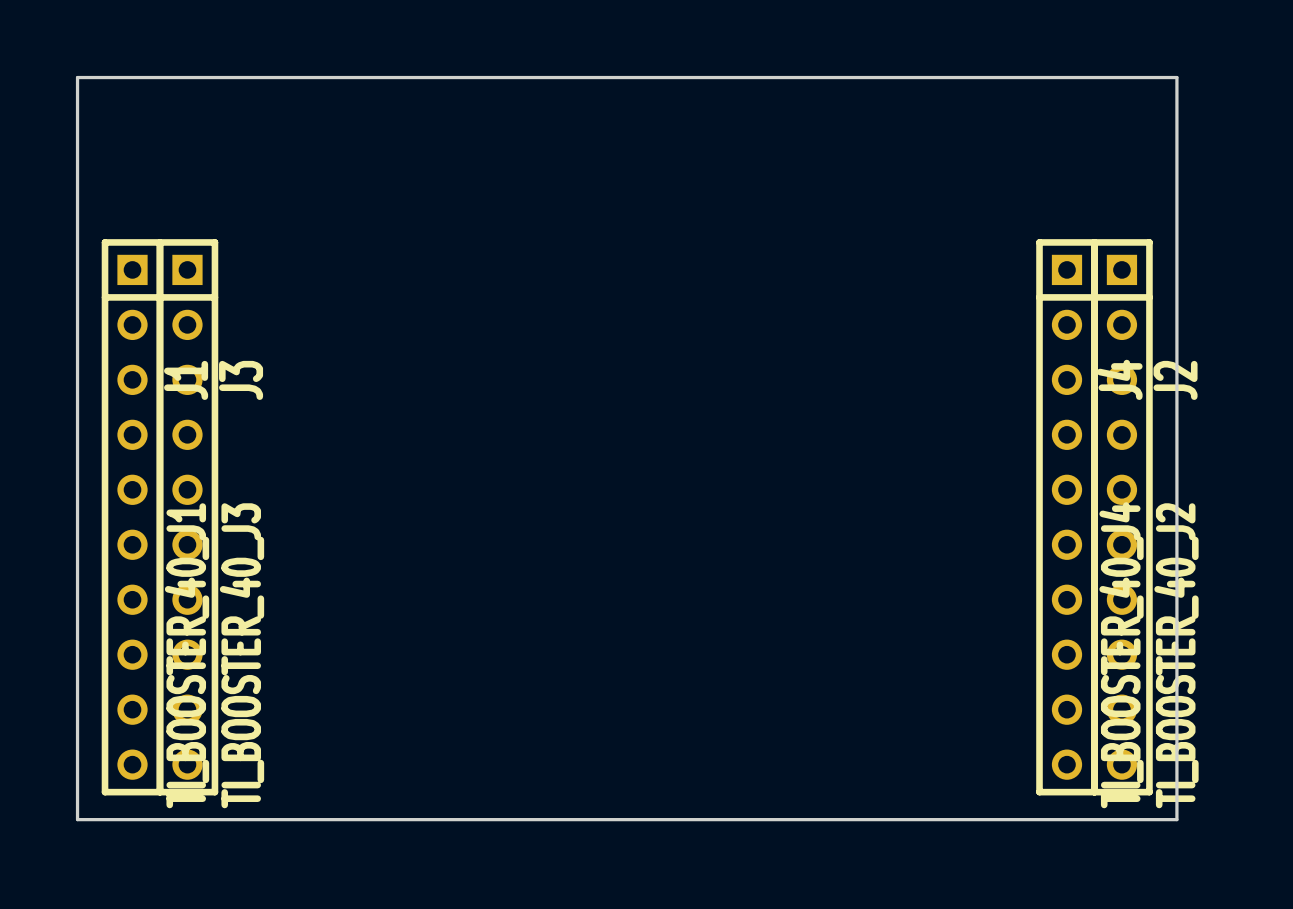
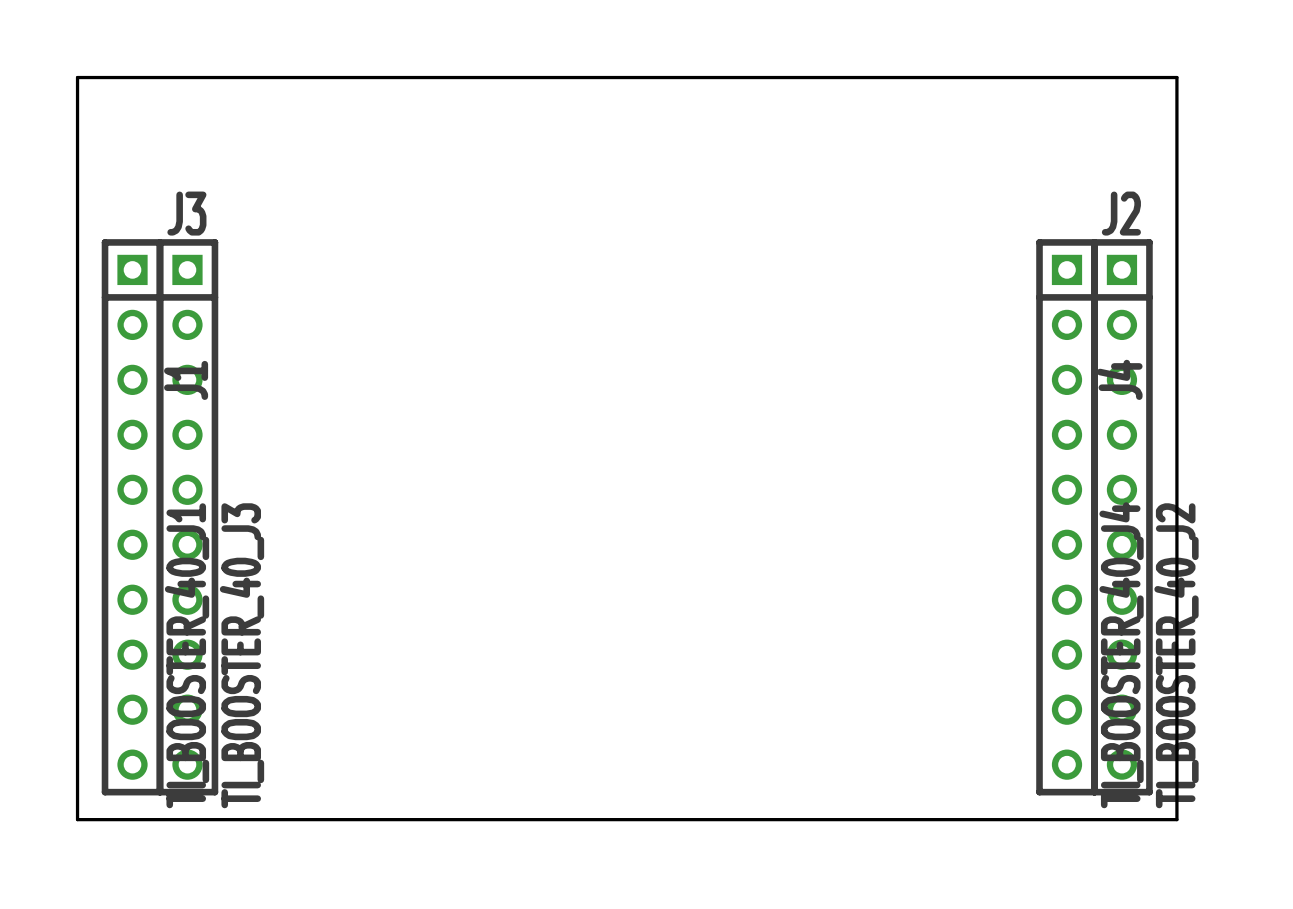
J3 name rotation: 0° (241, 380) -> 90° clockwise (186, 213)
J3 name position: J3 (241, 380) -> J3 (186, 213)
J2 name rotation: 0° (1175, 380) -> 90° clockwise (1121, 213)
J2 name position: J2 (1175, 380) -> J2 (1121, 213)

